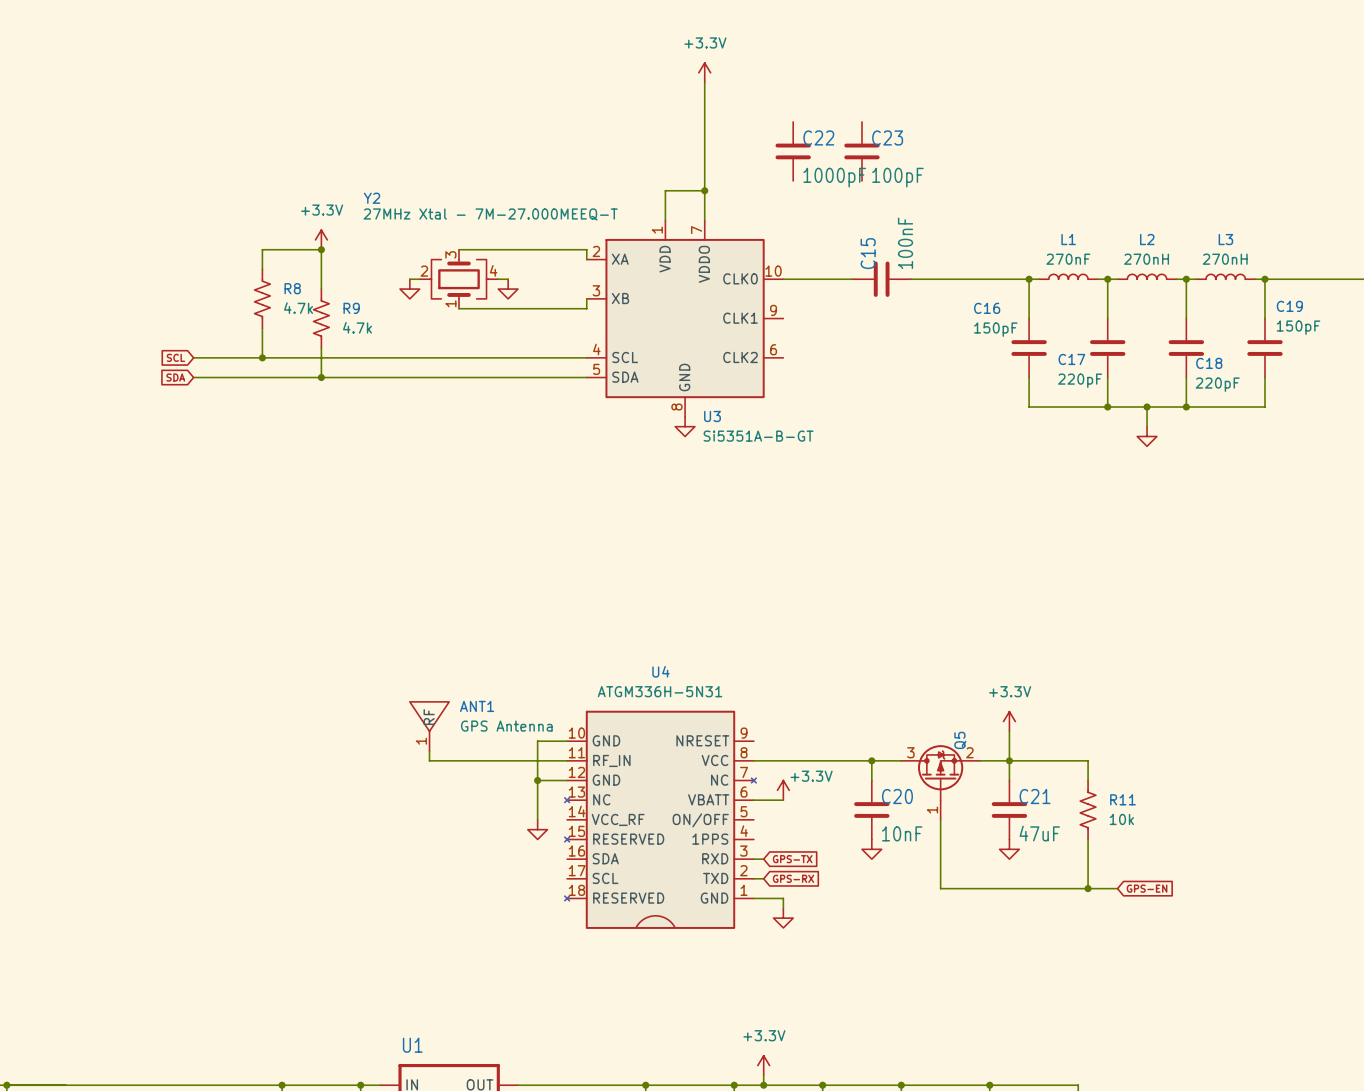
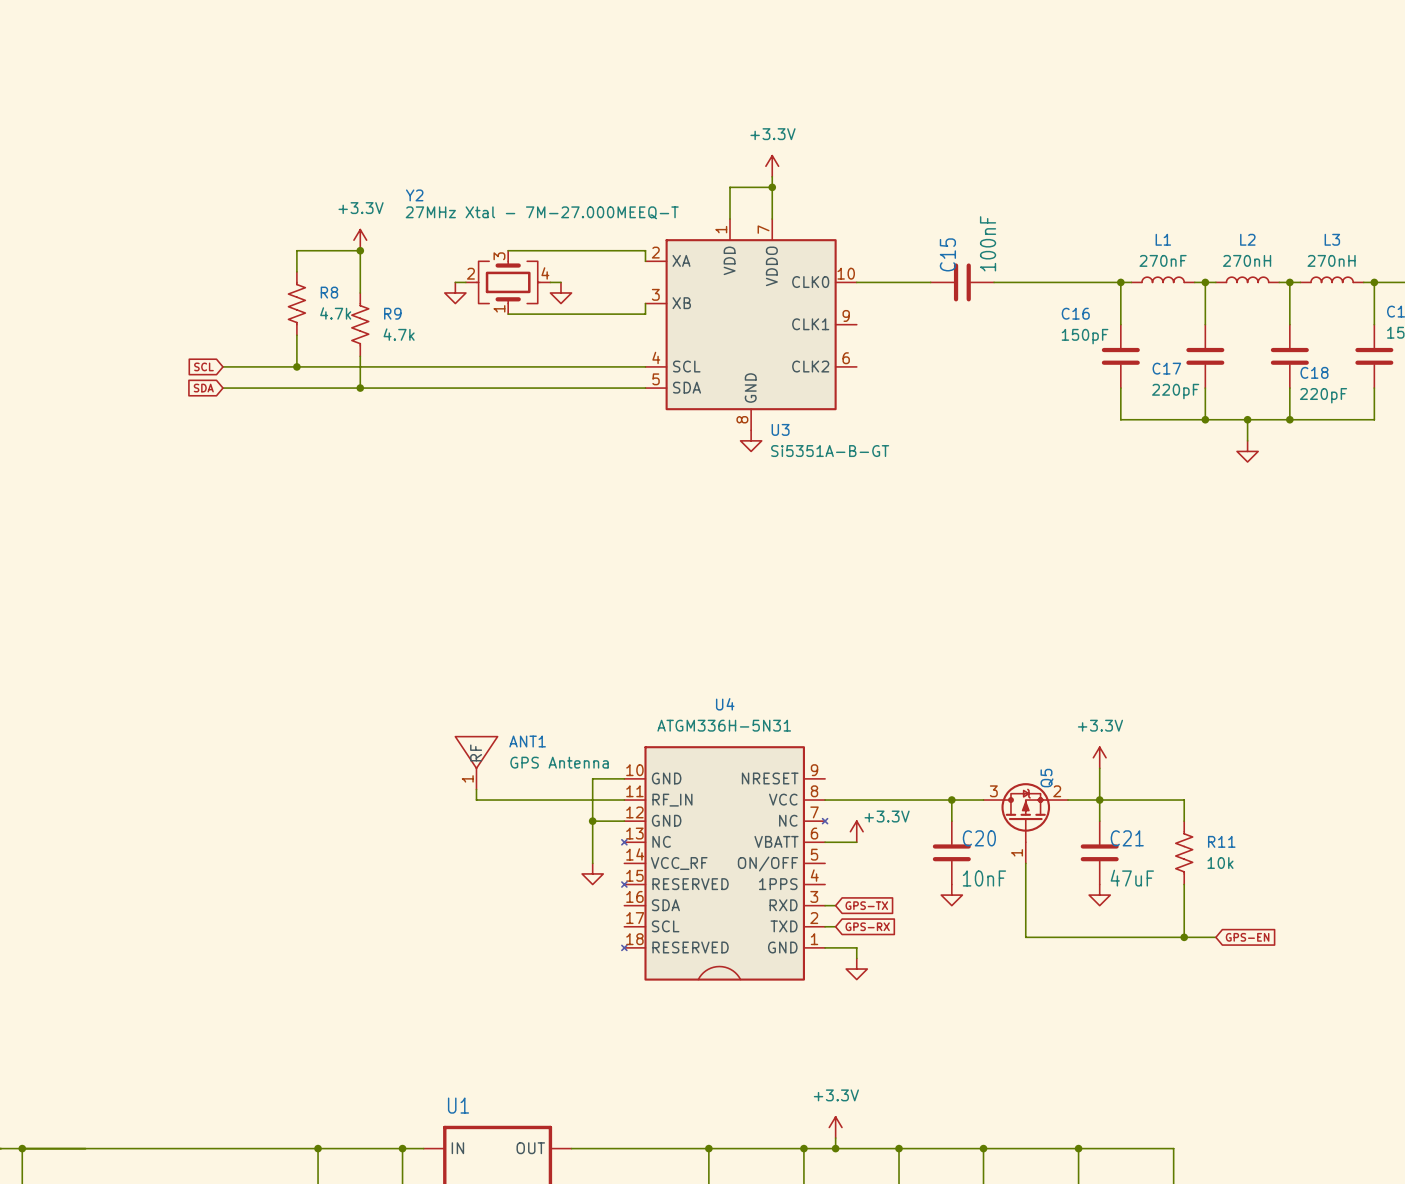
power symbol position: +3.3V (704, 72) -> +3.3V (772, 166)
wire: (704, 82) (704, 180) -> none
C22: 1000pF (793, 151) -> none
C23: 100pF (861, 151) -> none

